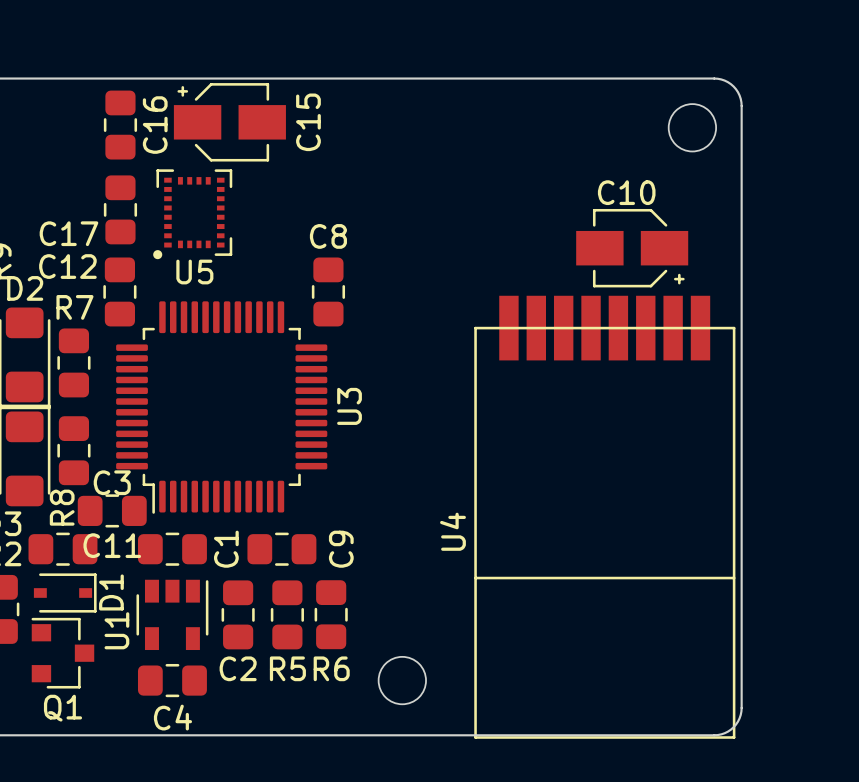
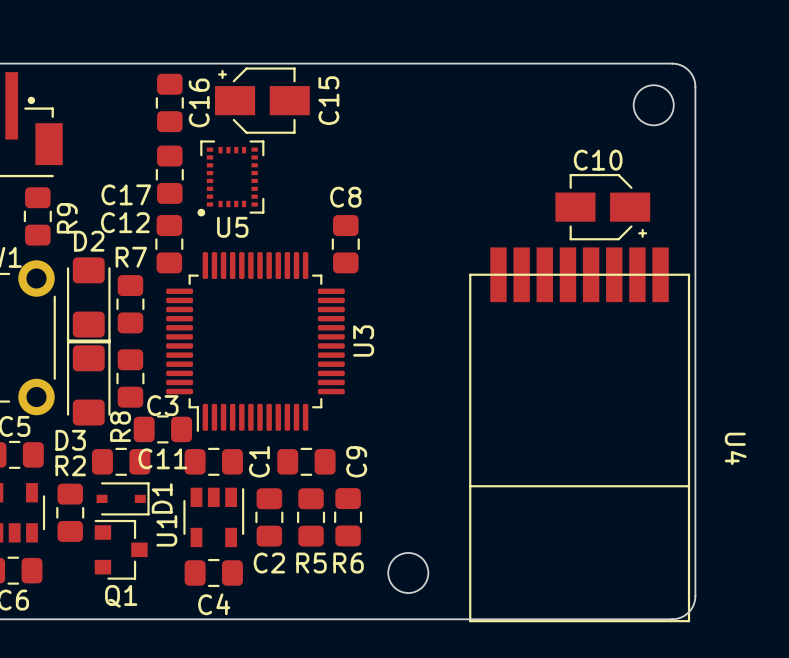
U4 name rotation: 0° (453, 531) -> 180° (735, 448)
U4 name position: U4 (453, 531) -> U4 (735, 448)

